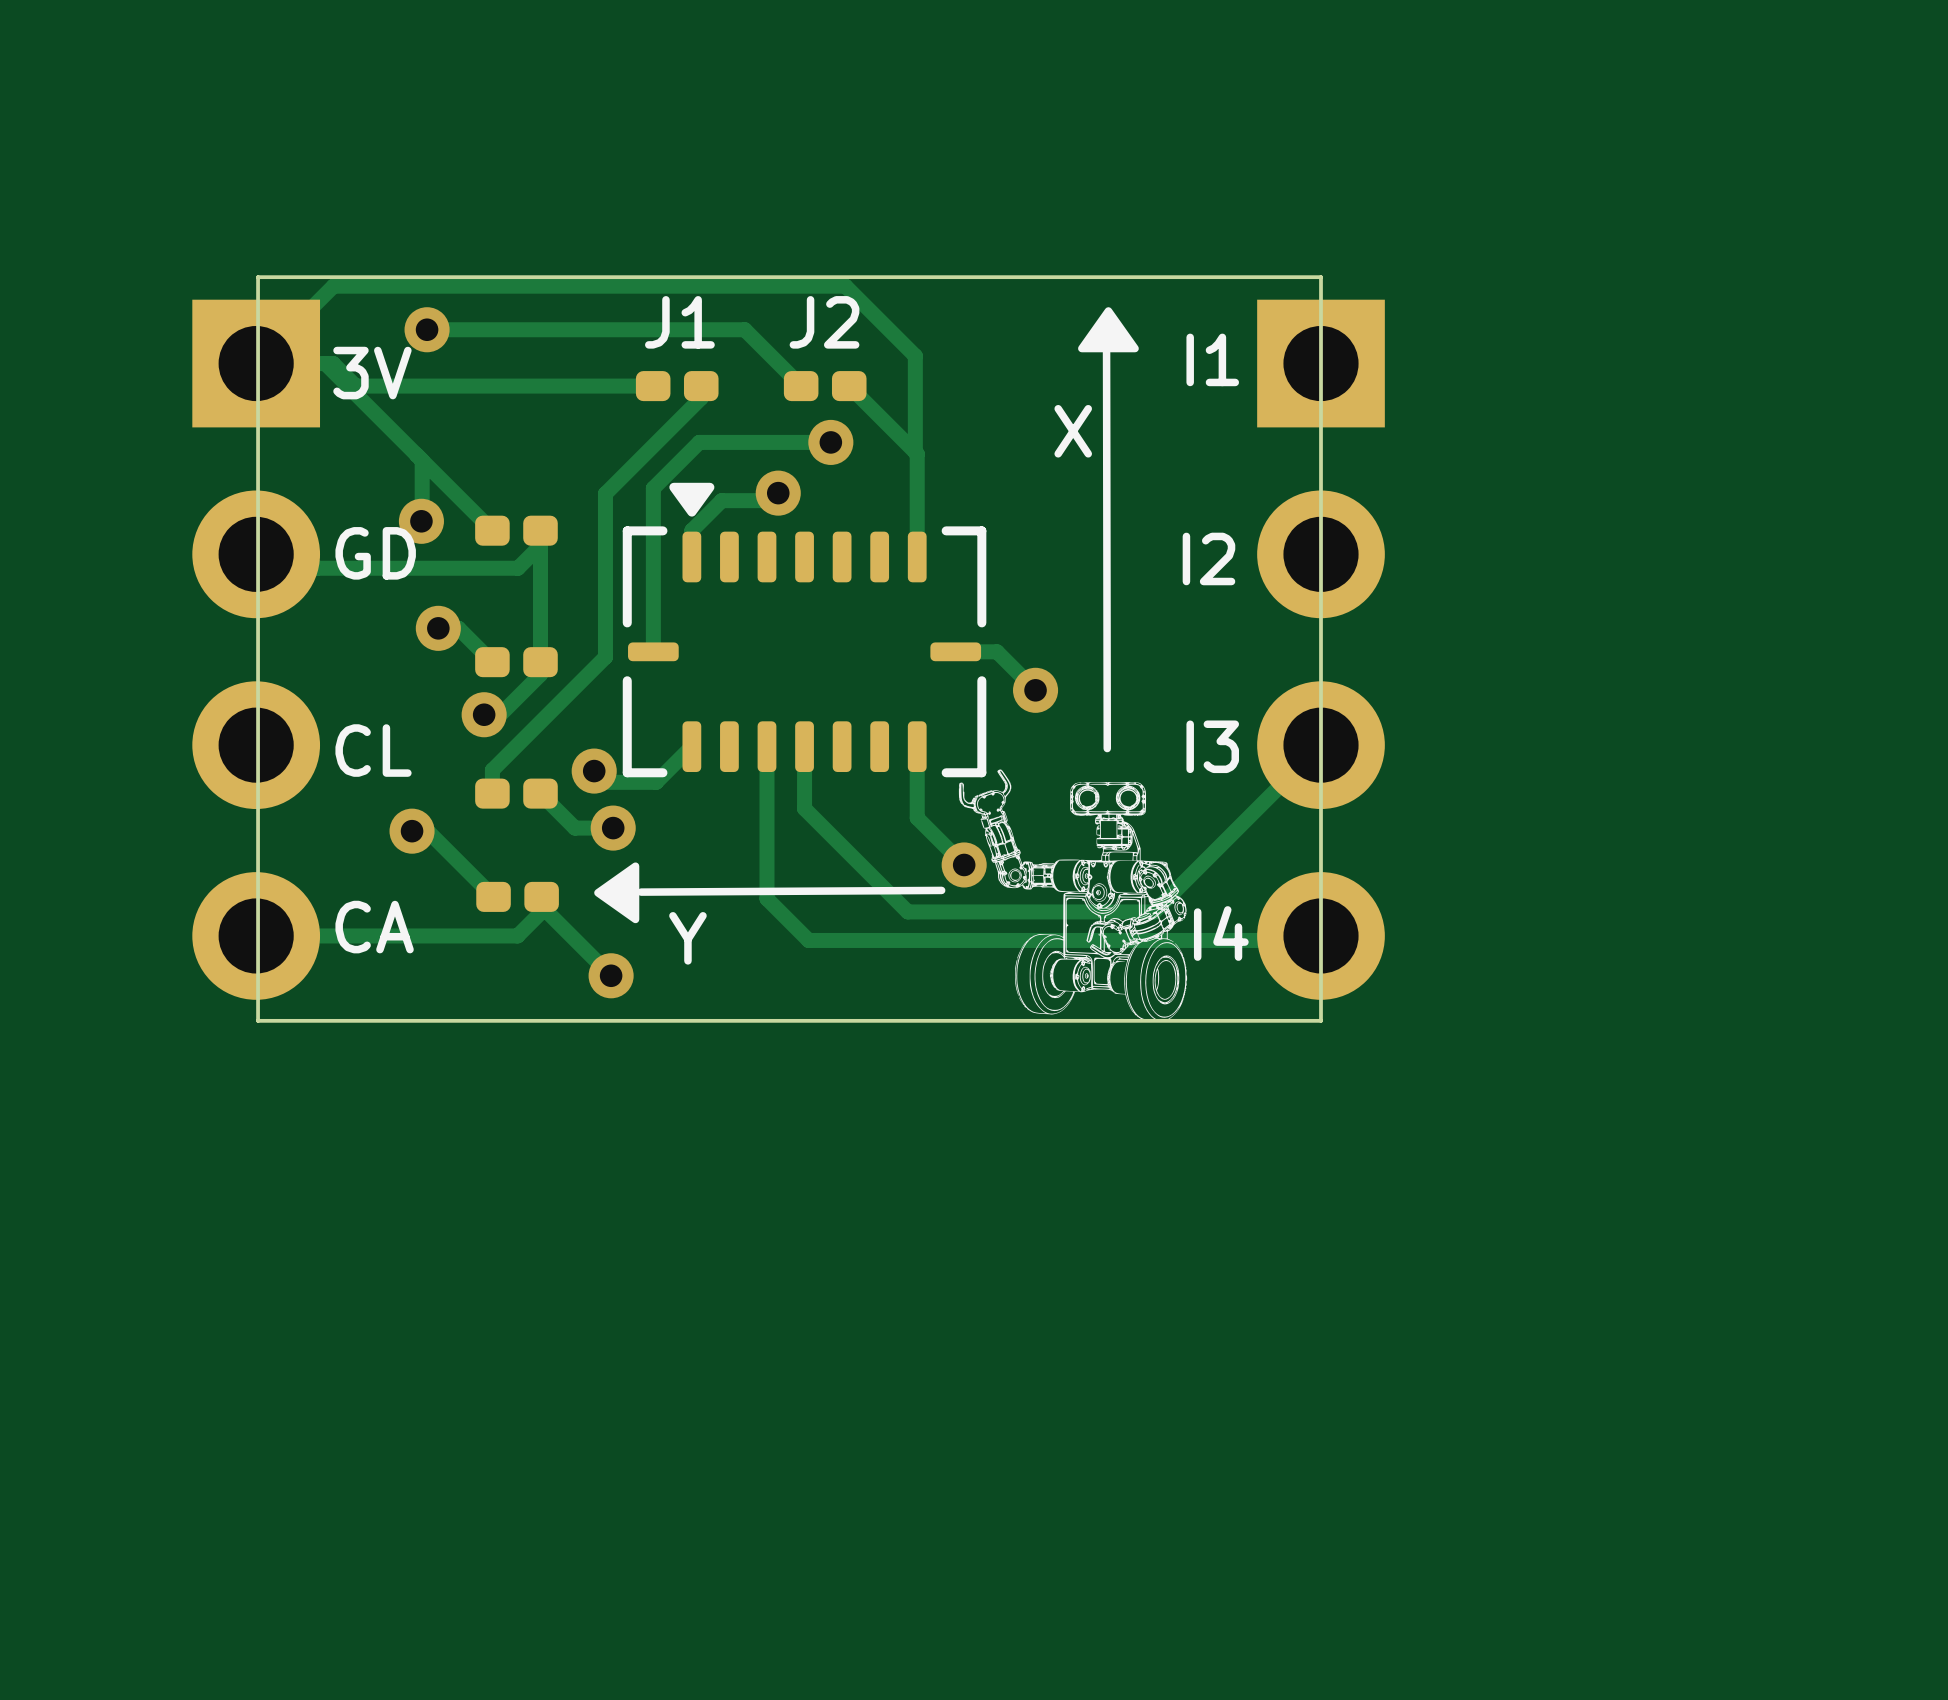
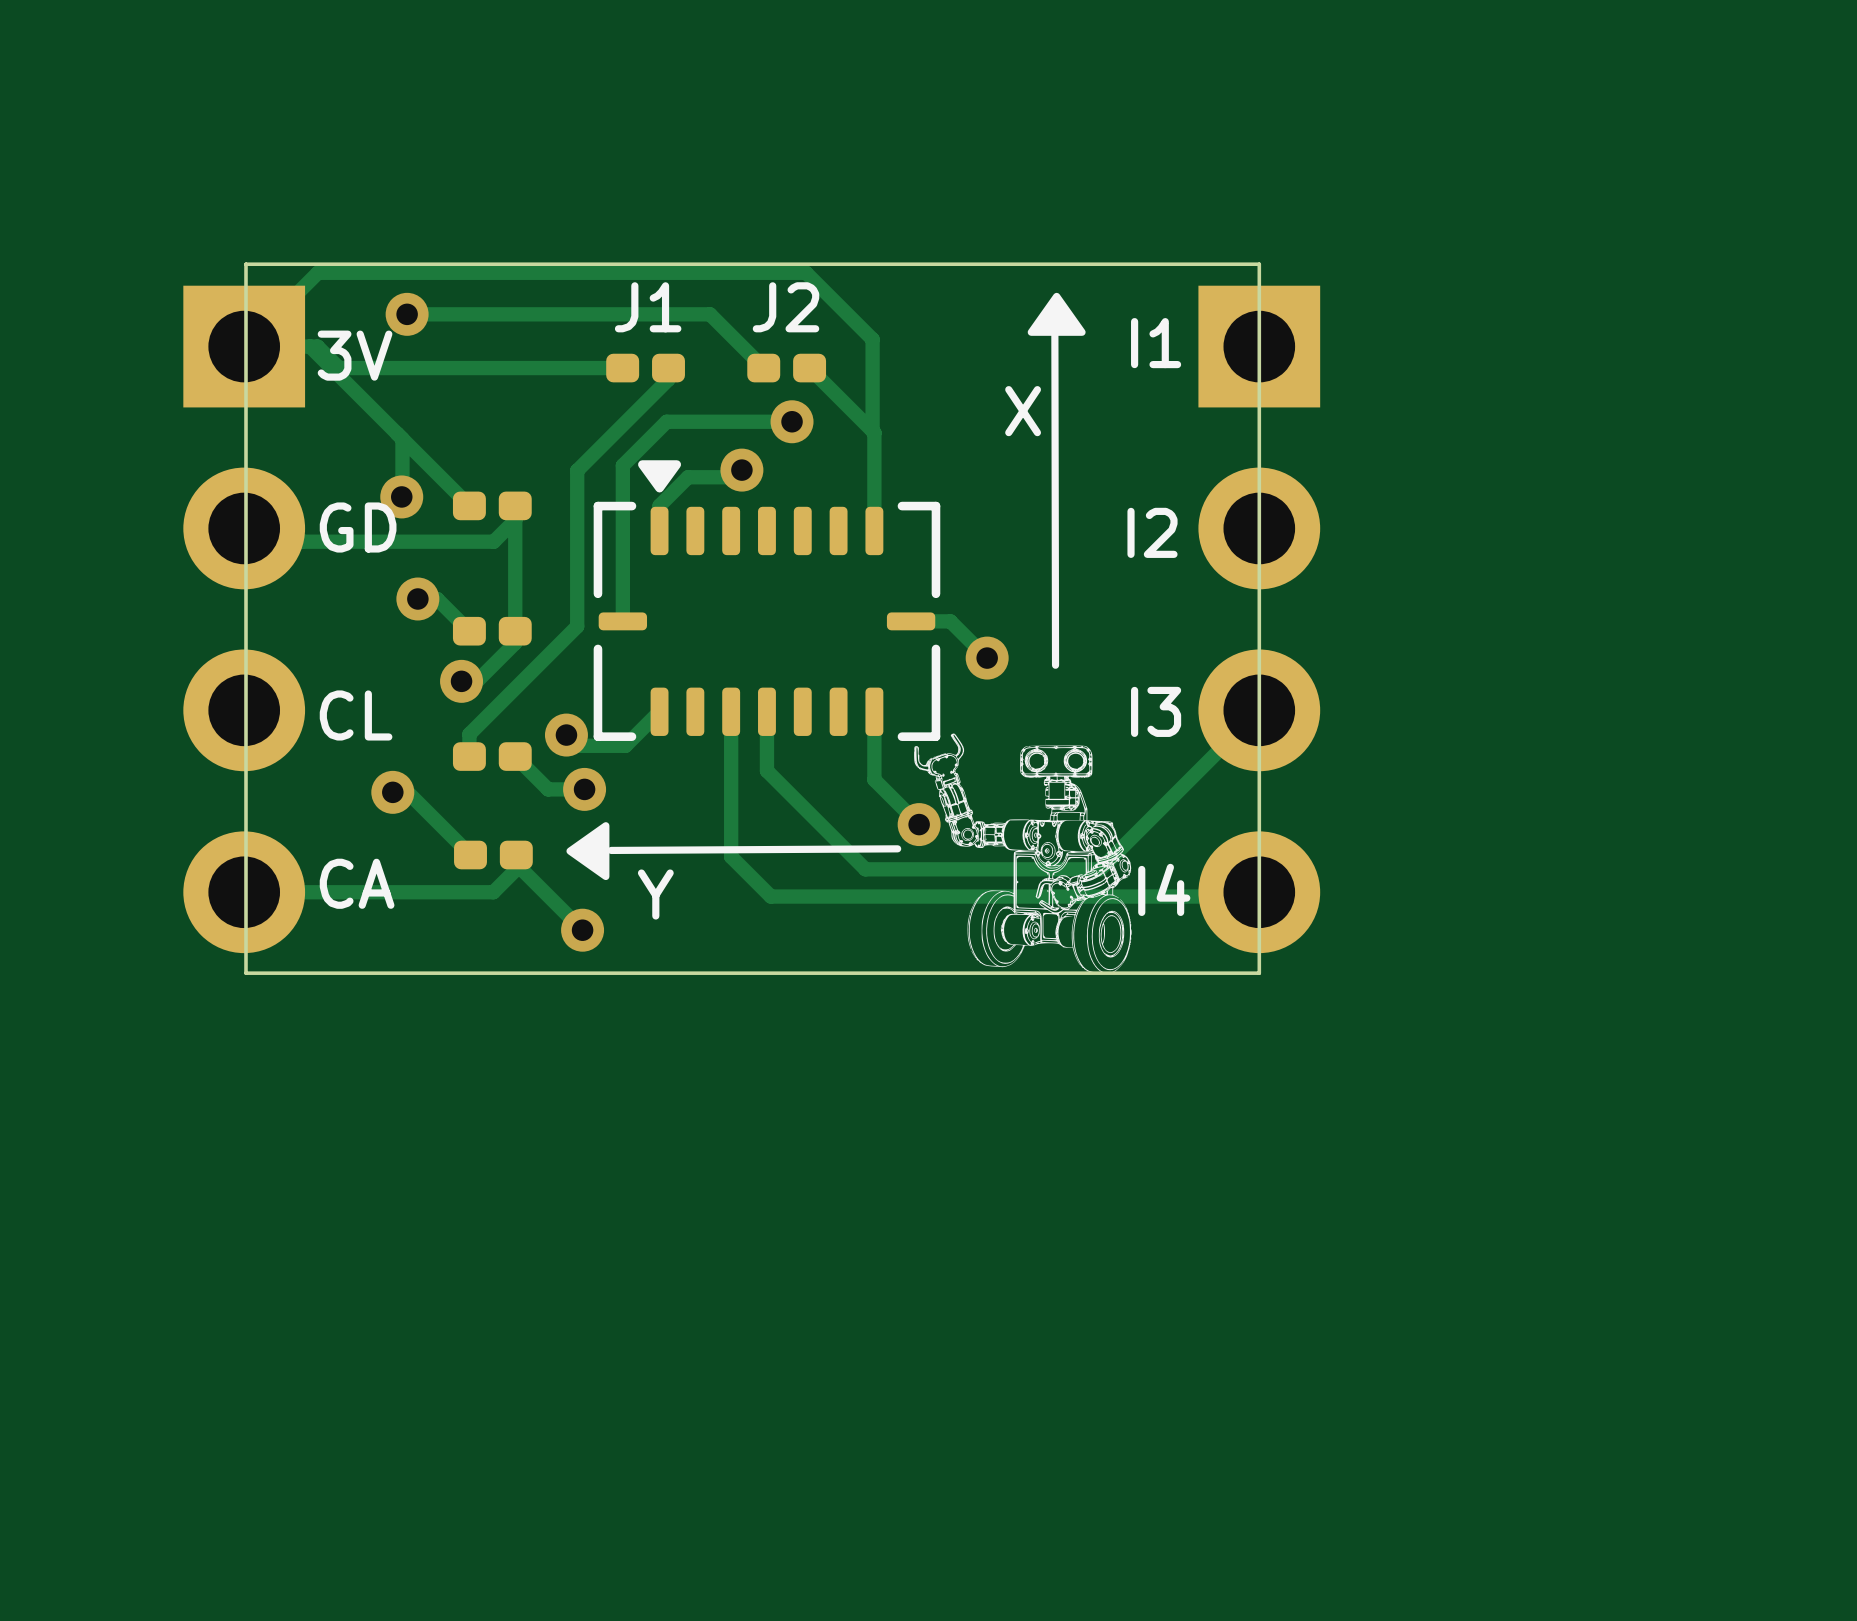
line: (1106, 348) (1107, 748) -> (1054, 332) (1055, 665)

